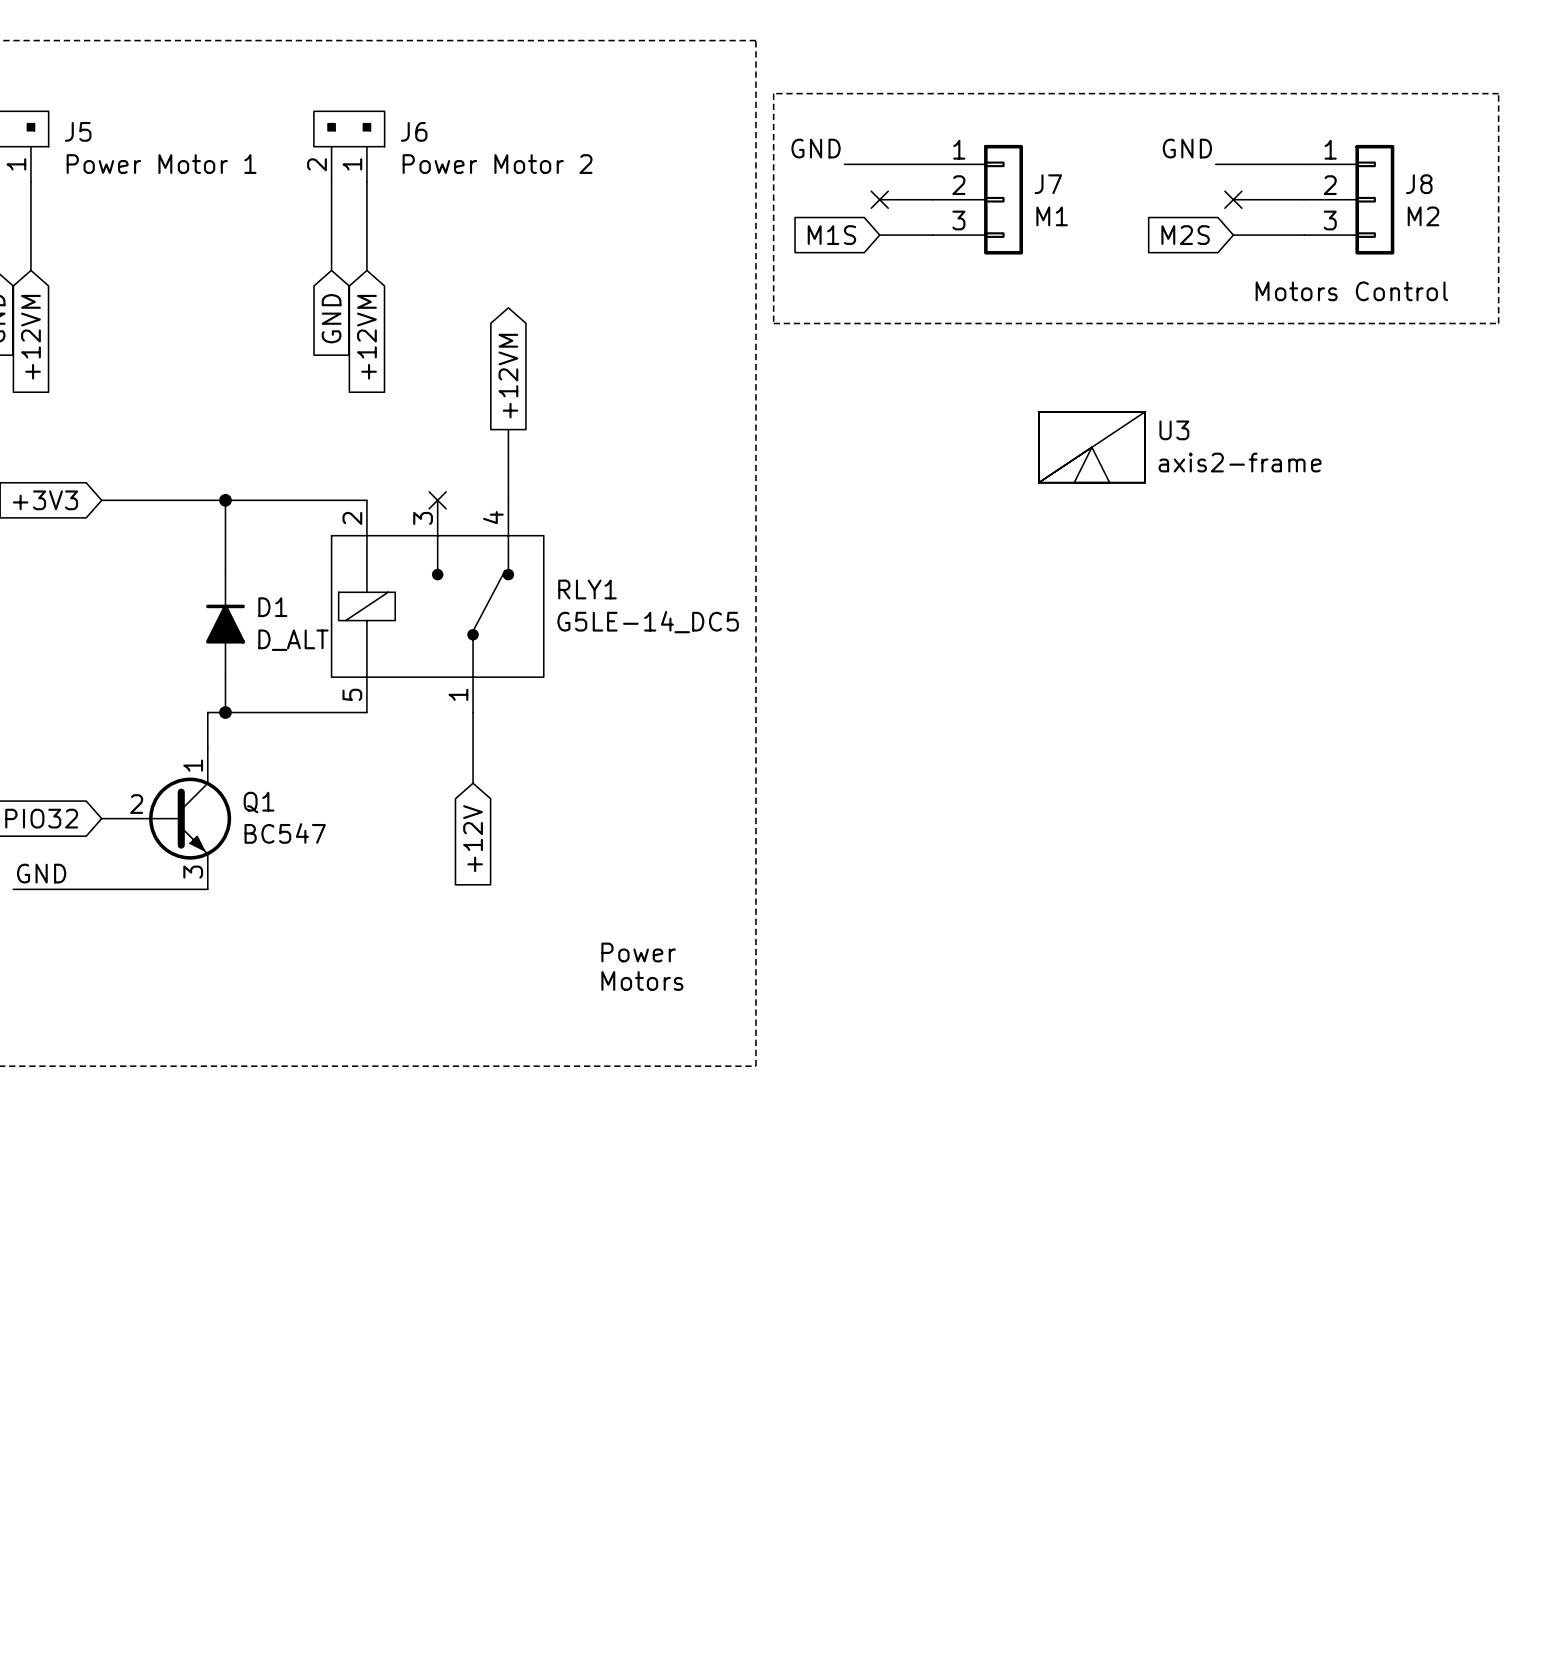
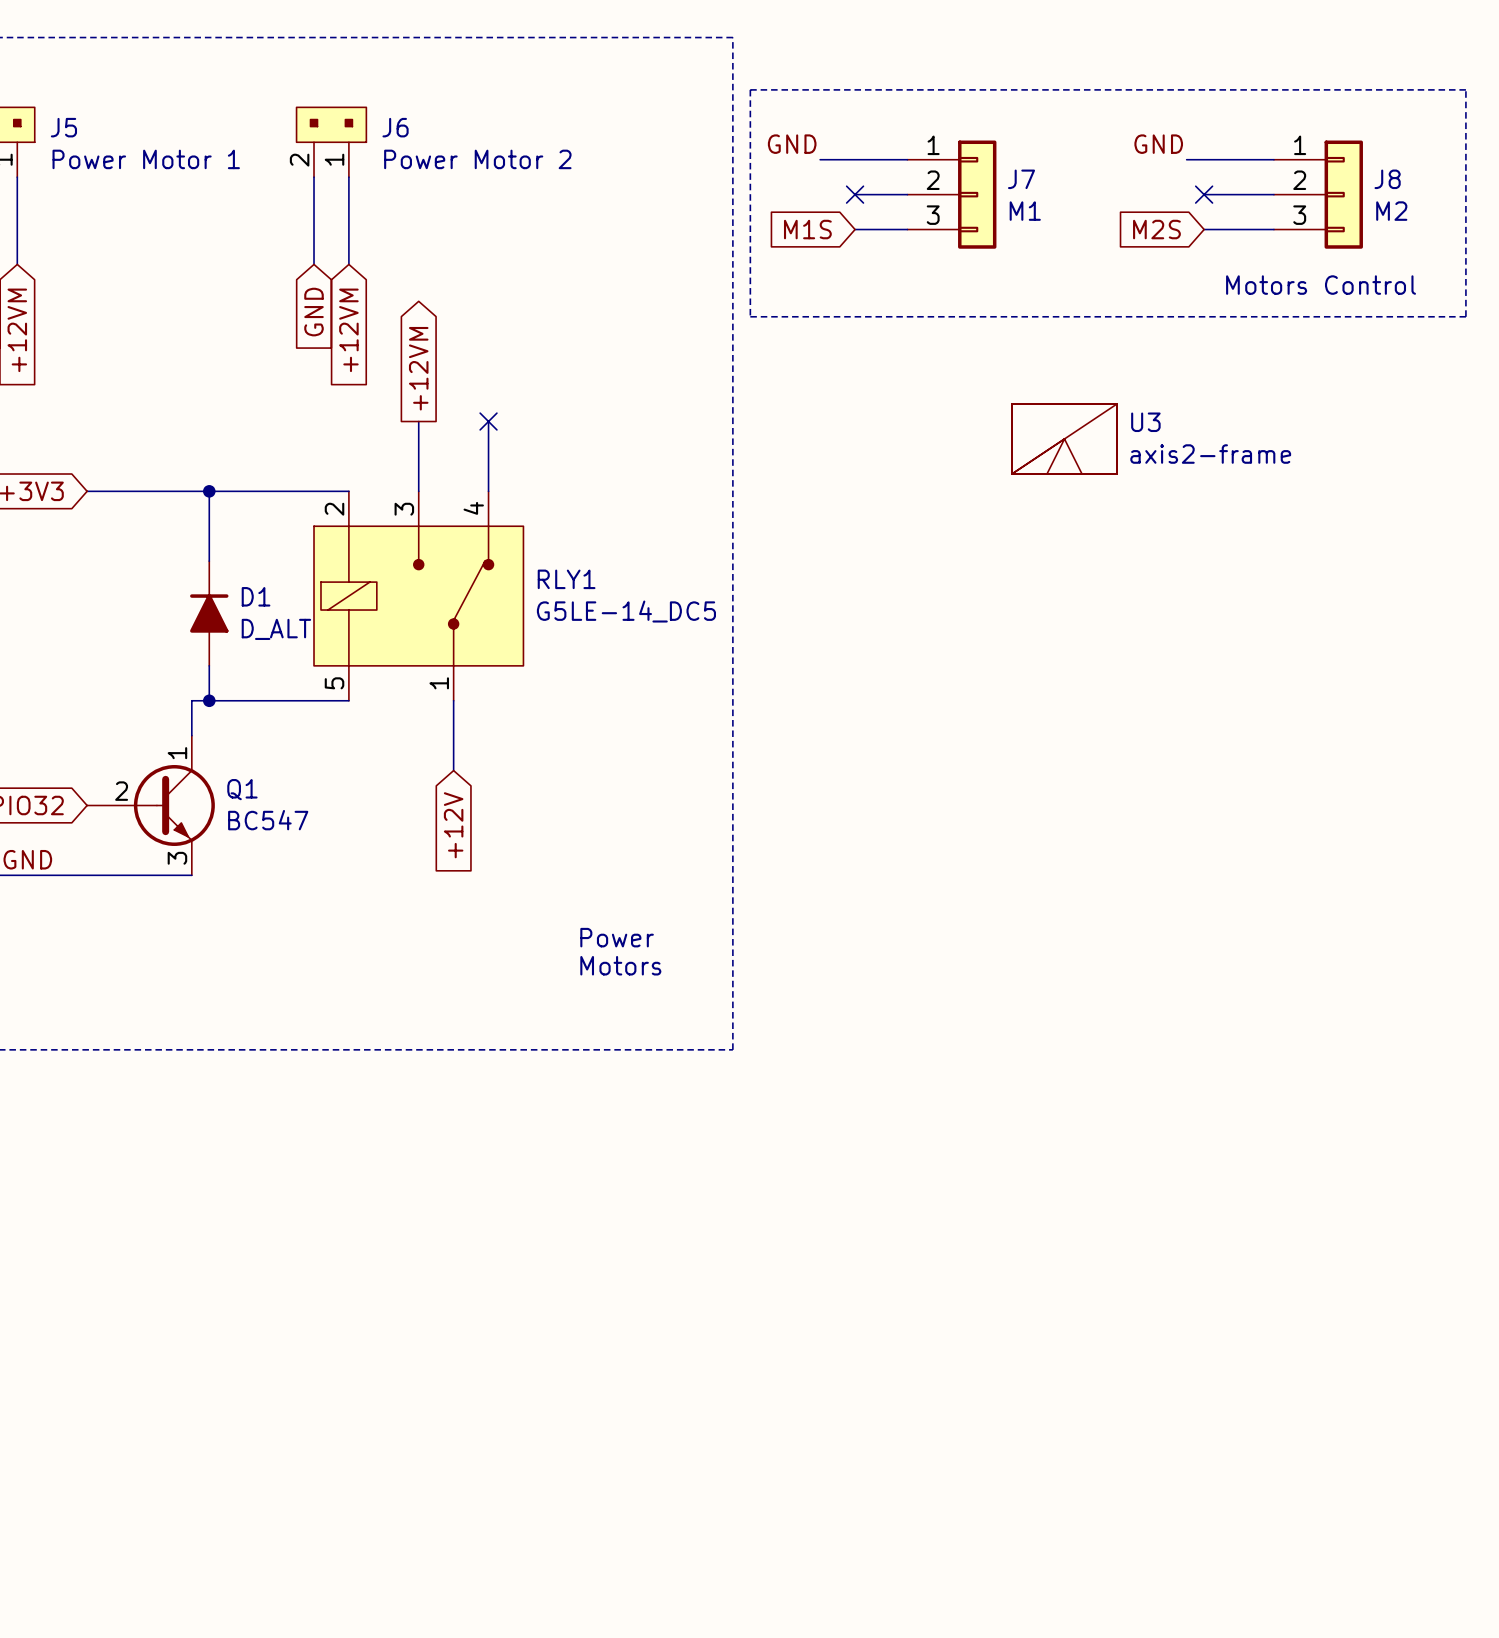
global label position: +12VM (508, 376) -> +12VM (418, 368)
wire: none -> (418, 421) (418, 491)
no-connect mark: none -> (488, 421)
no-connect mark: (437, 500) -> none

